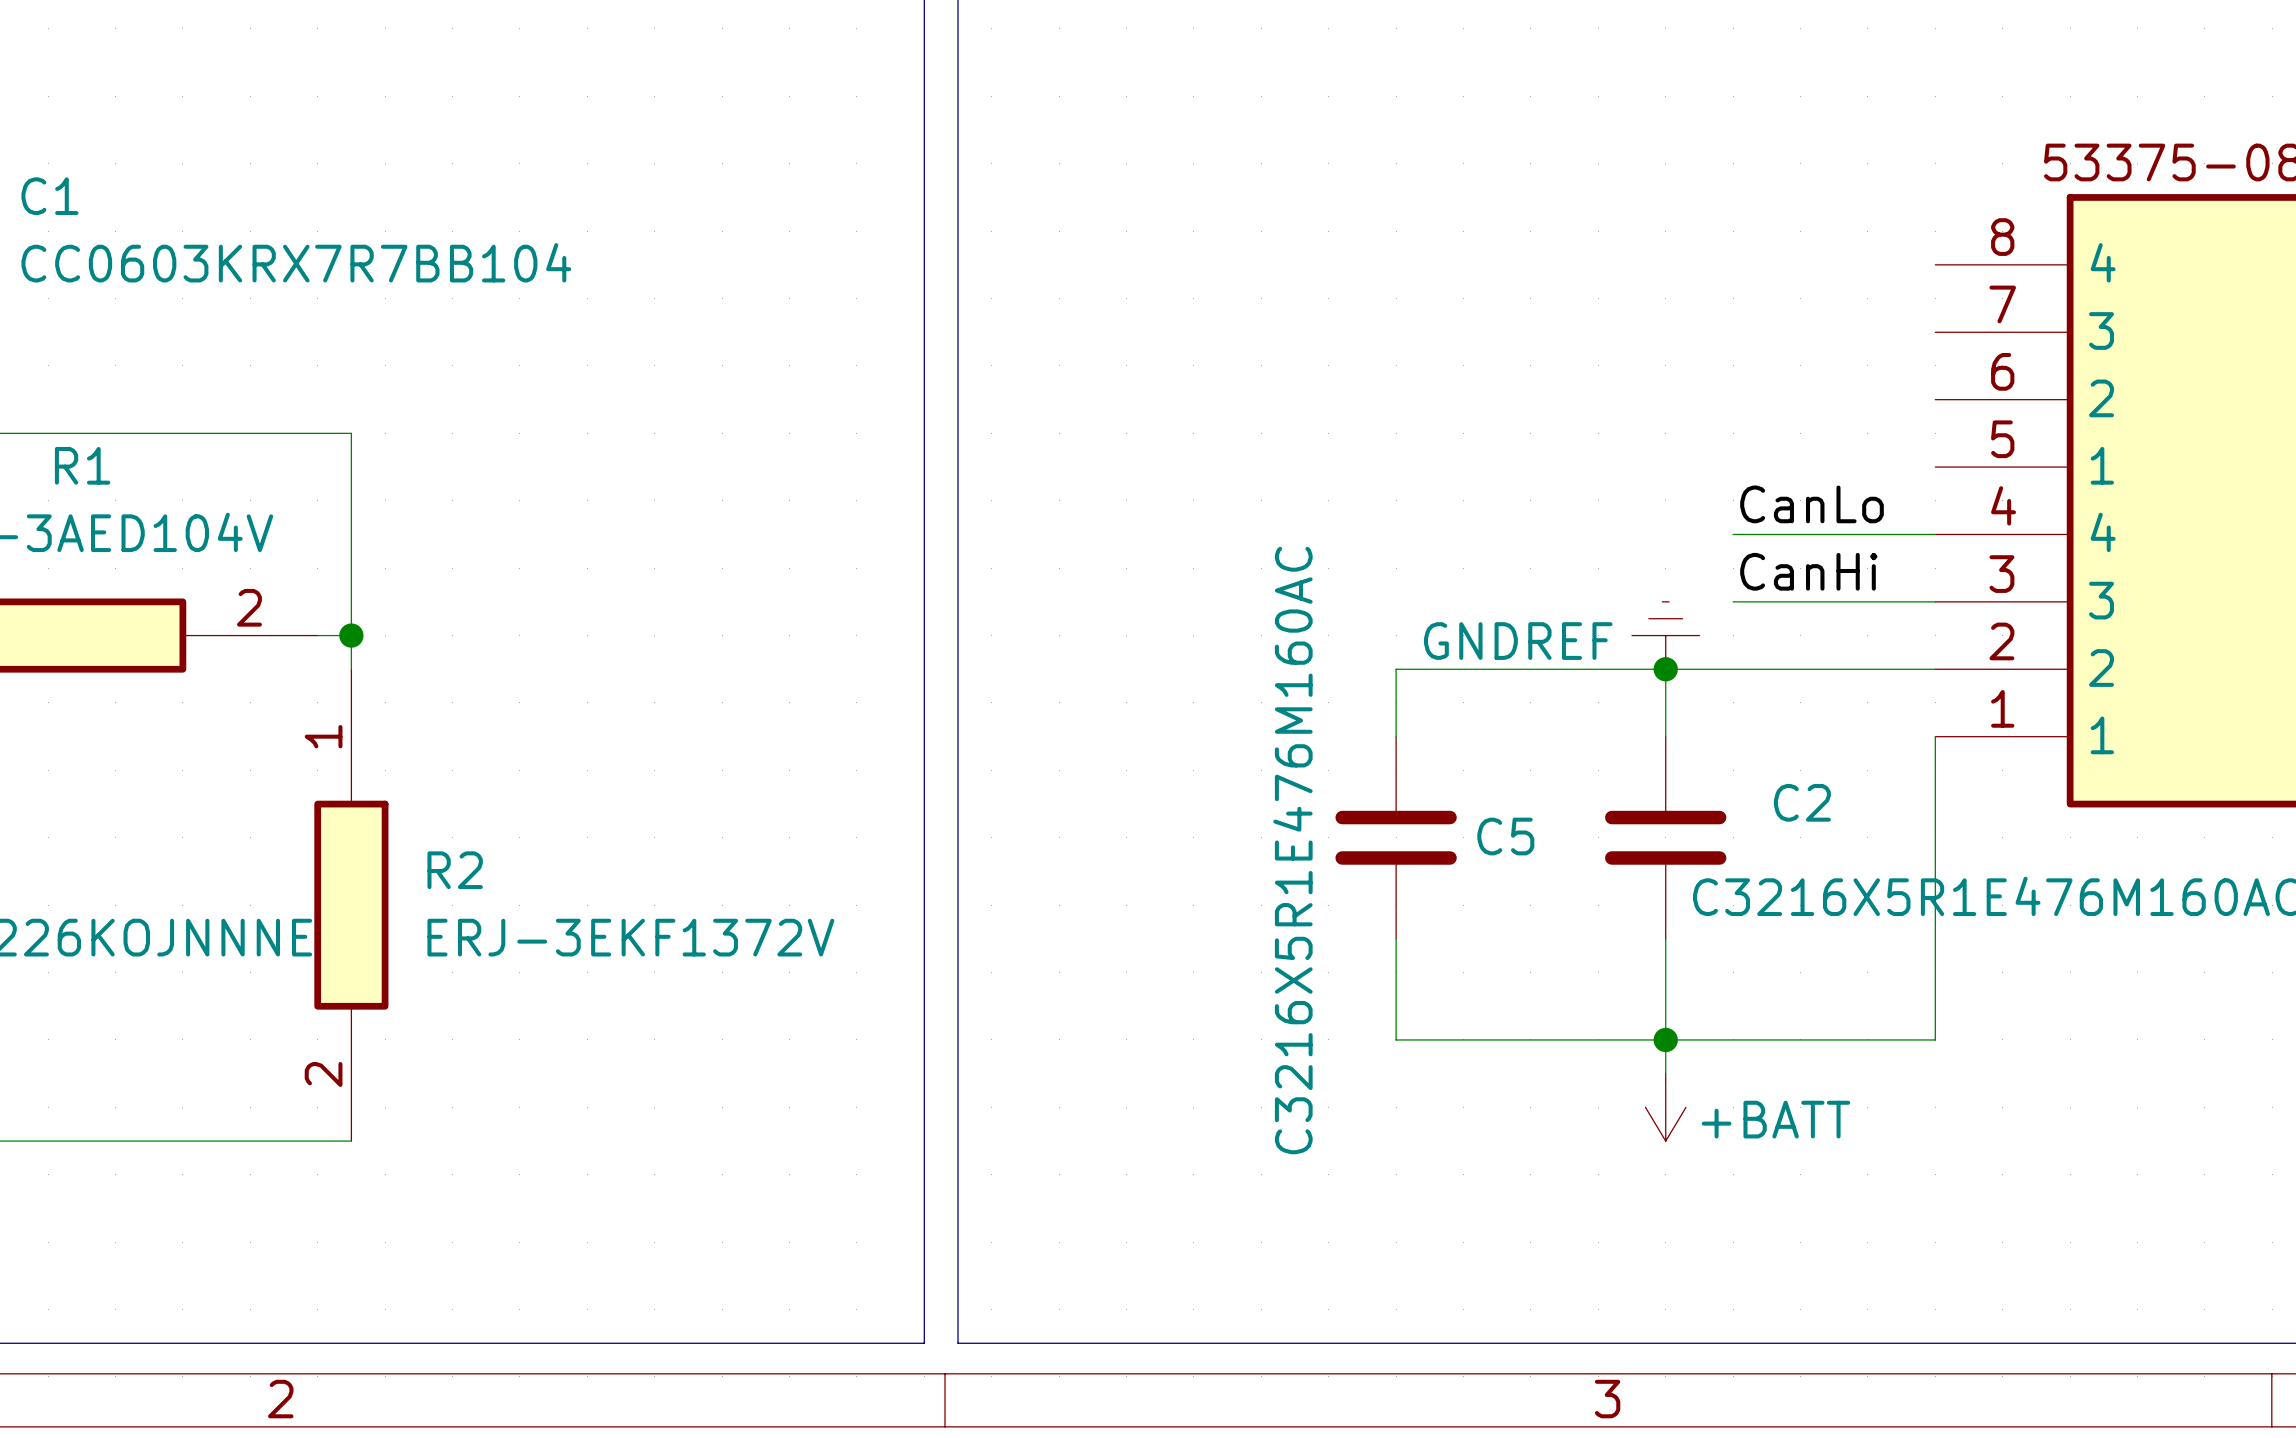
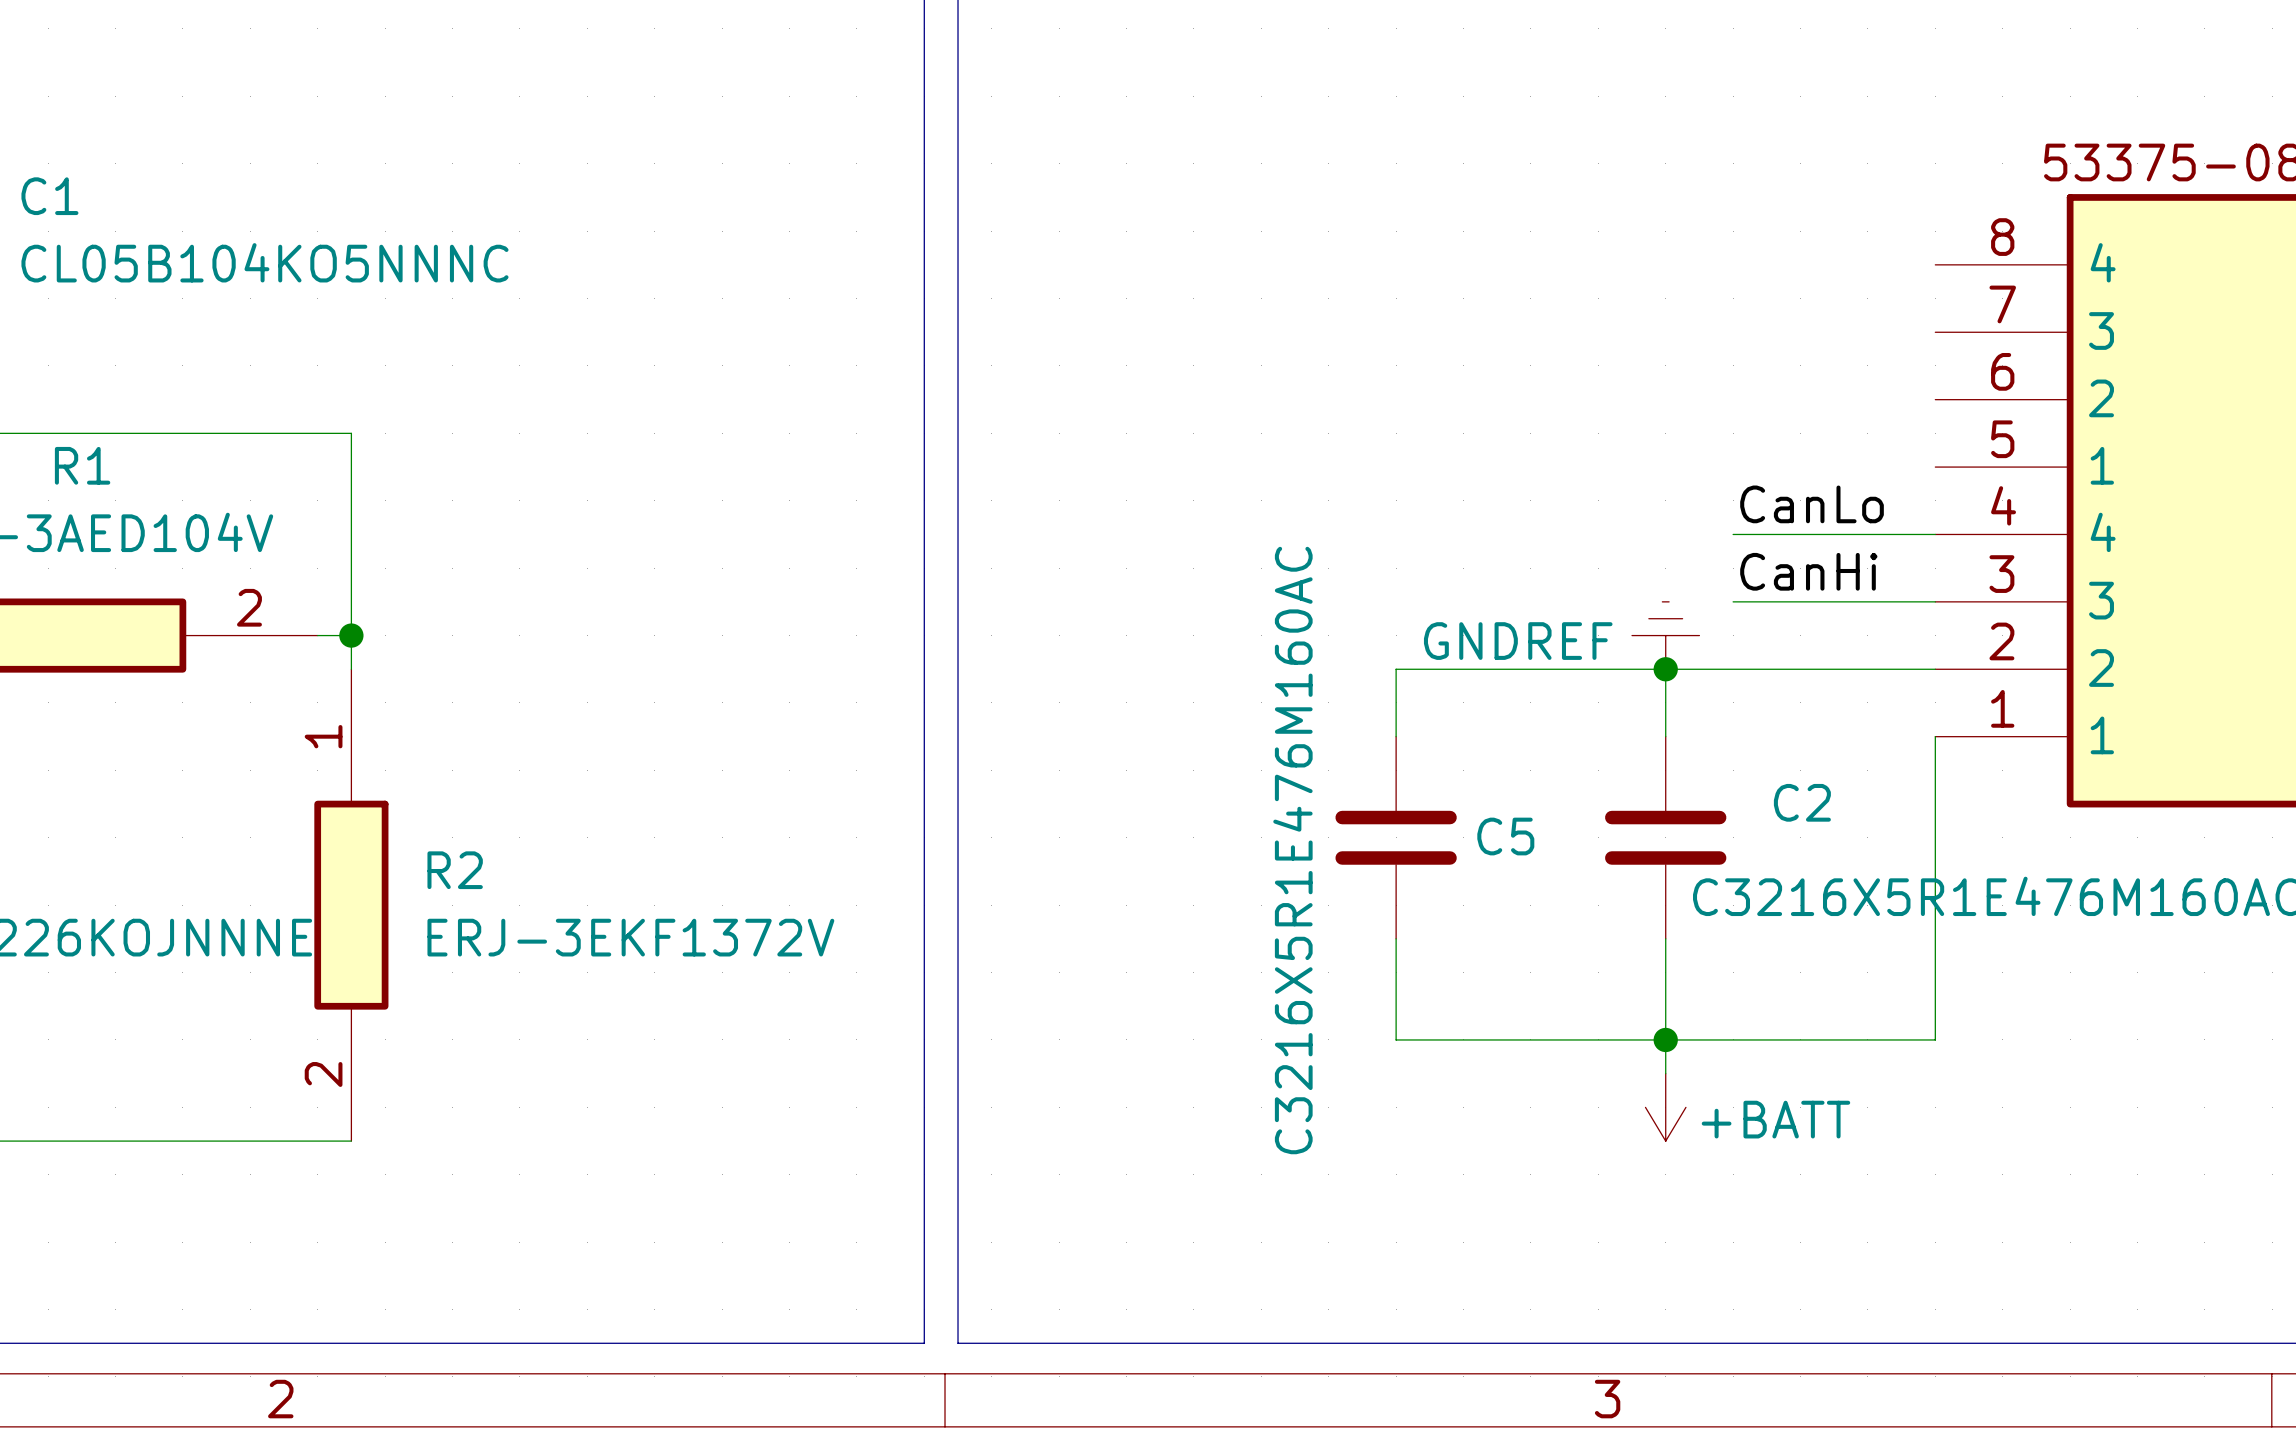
C1 value: CC0603KRX7R7BB104 (296, 262) -> CL05B104KO5NNNC (264, 262)

